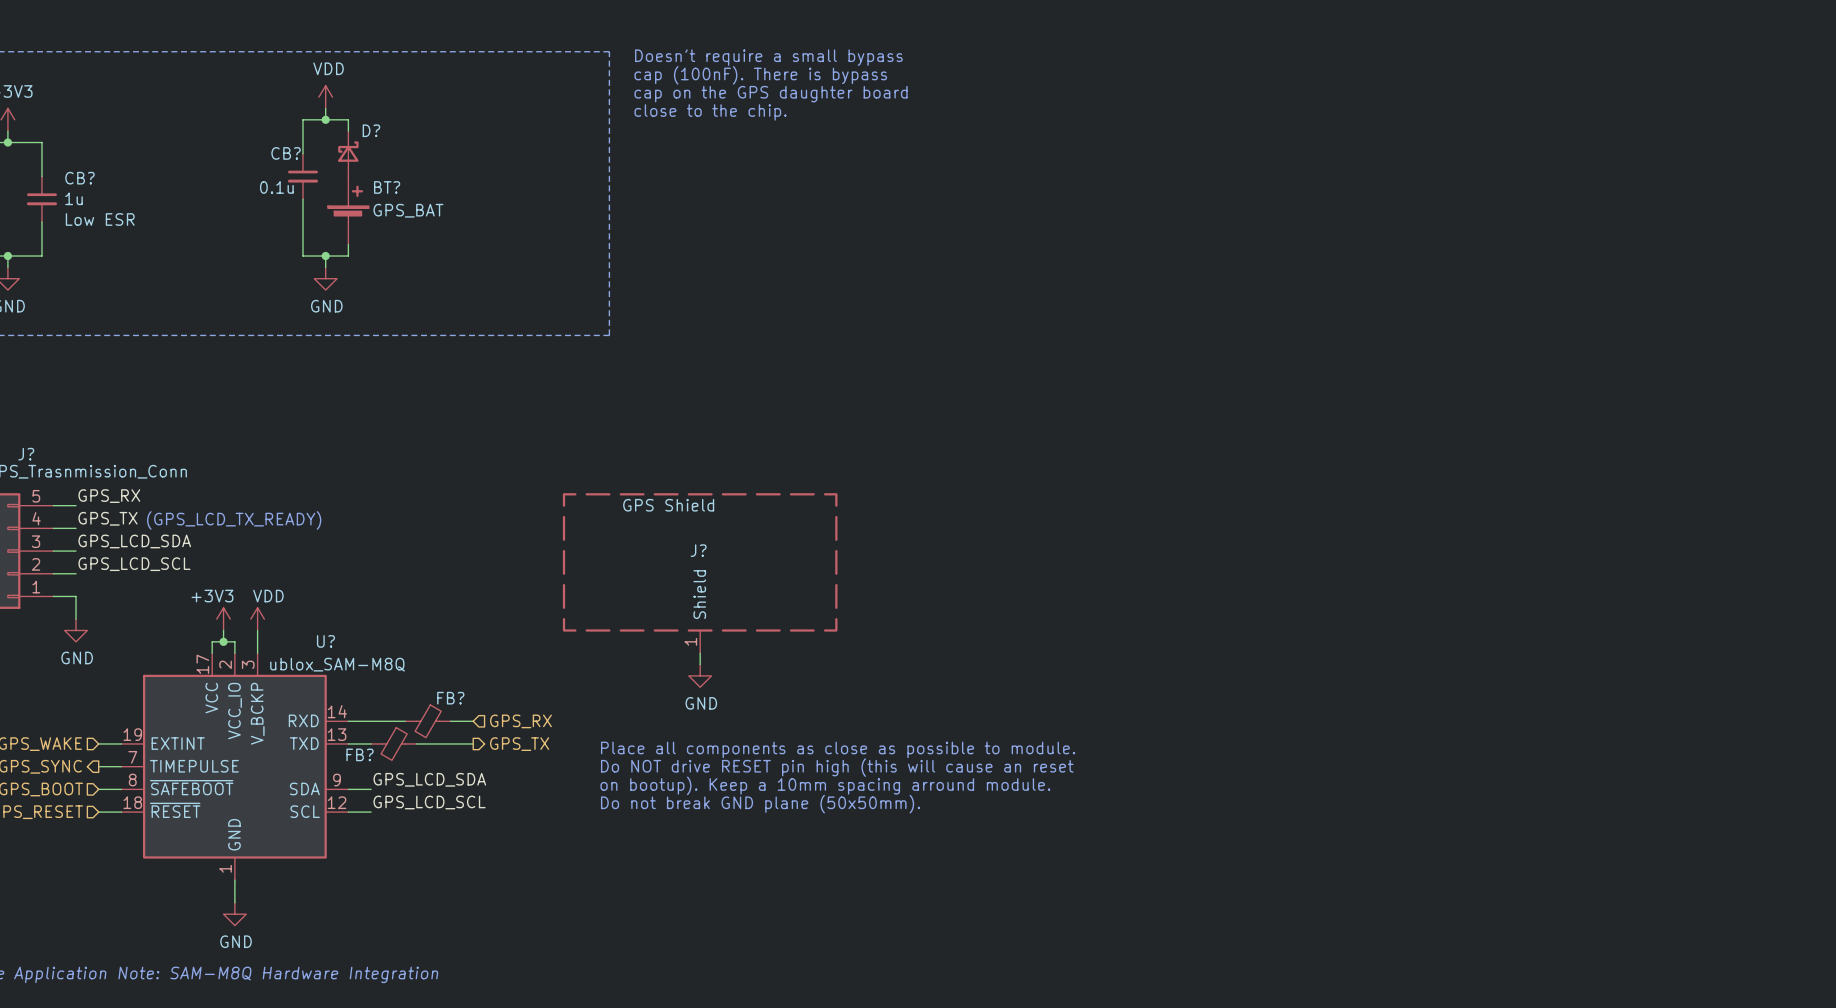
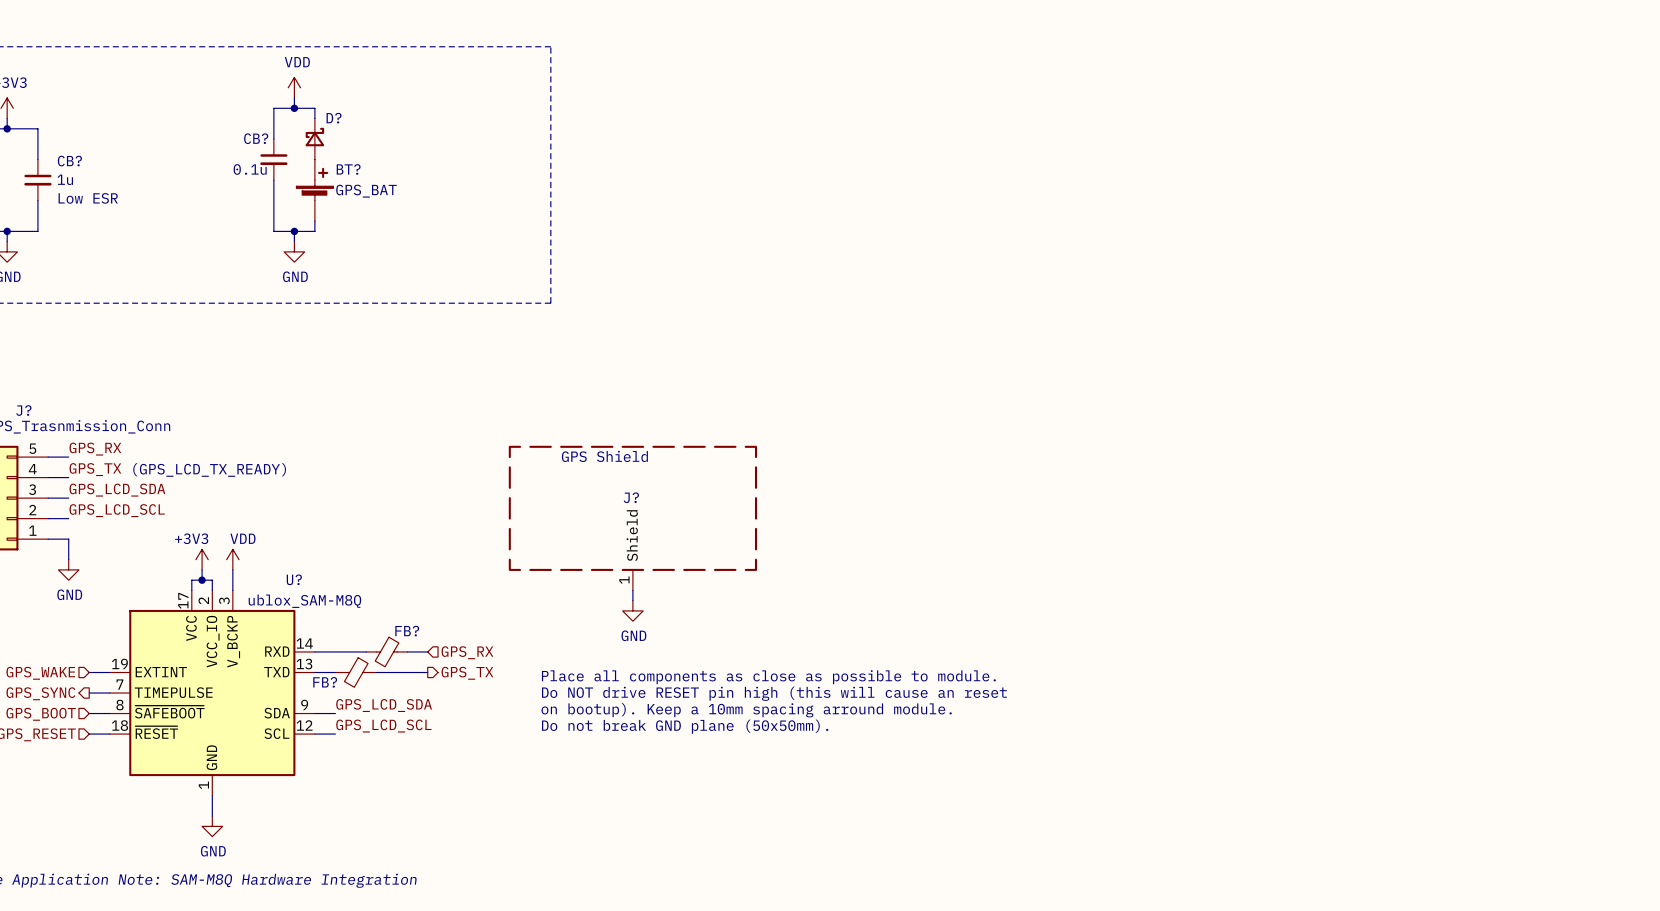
text: Doesn't require a small bypass (768, 57) -> none
text: cap (100nF). There is bypass (760, 75) -> none
text: cap on the GPS daughter board (771, 94) -> none
text: close to the chip. (710, 112) -> none

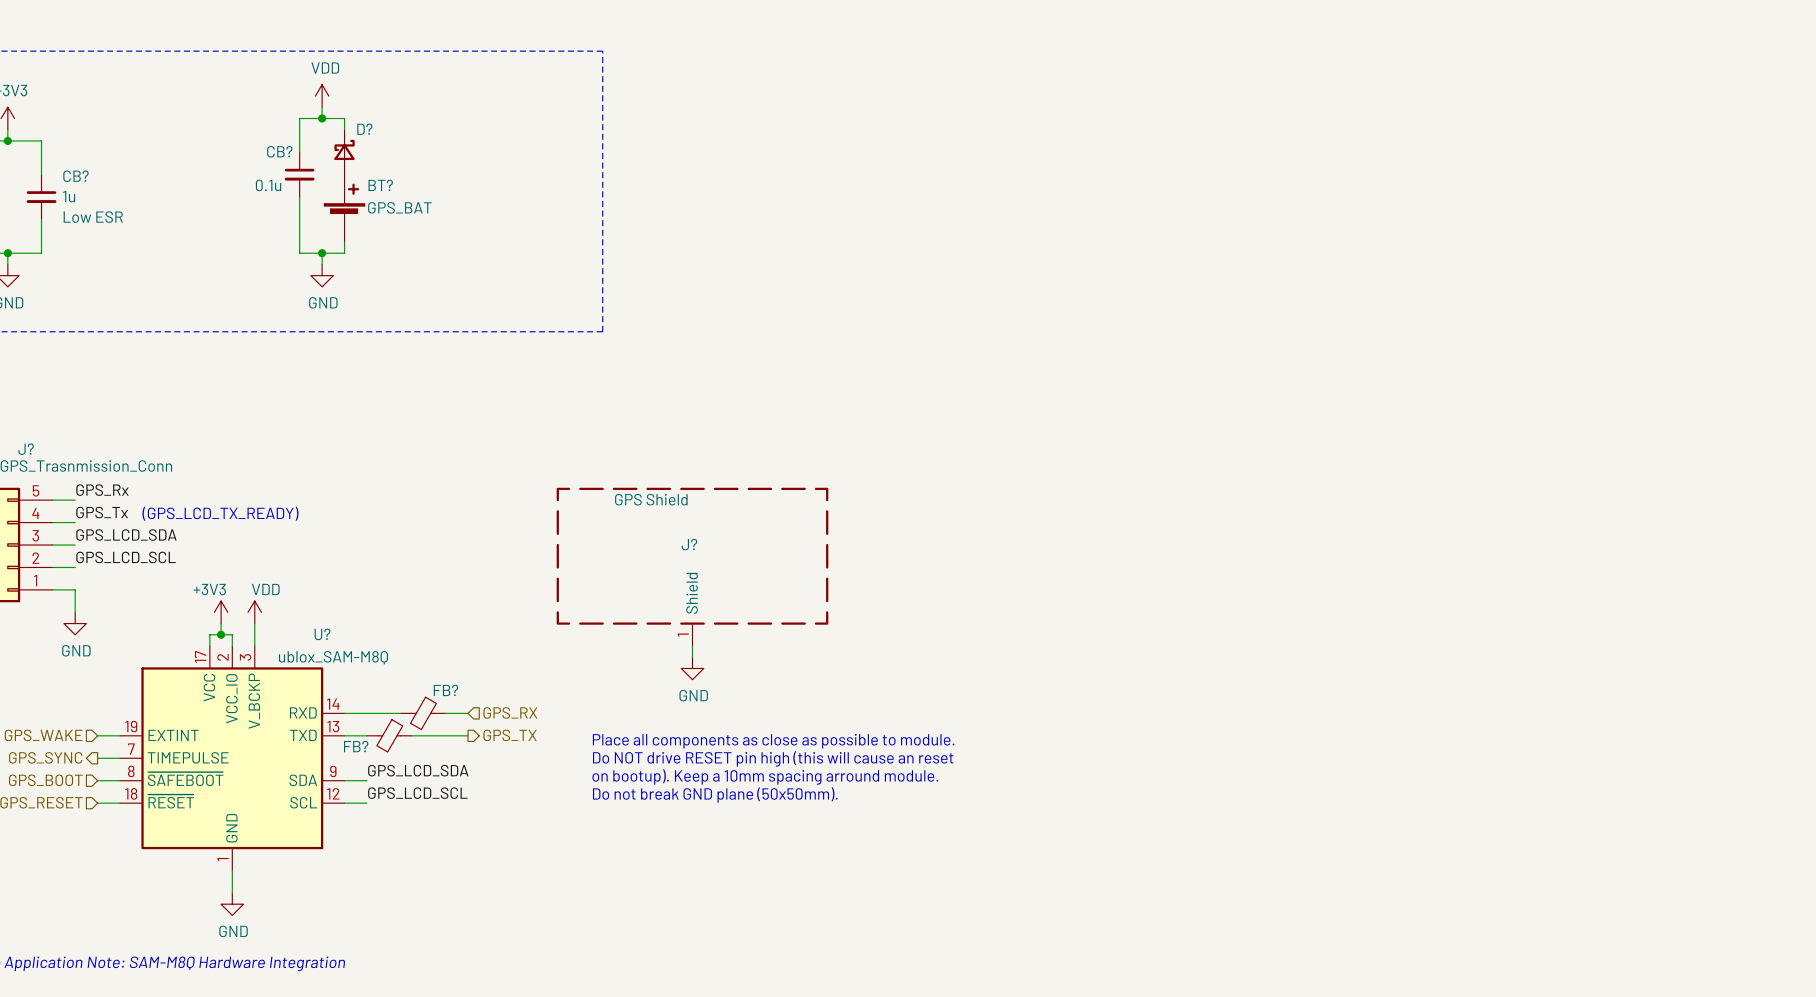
label: GPS_RX (95, 449) -> GPS_Rx (102, 490)
label: GPS_TX (95, 469) -> GPS_Tx (102, 512)

